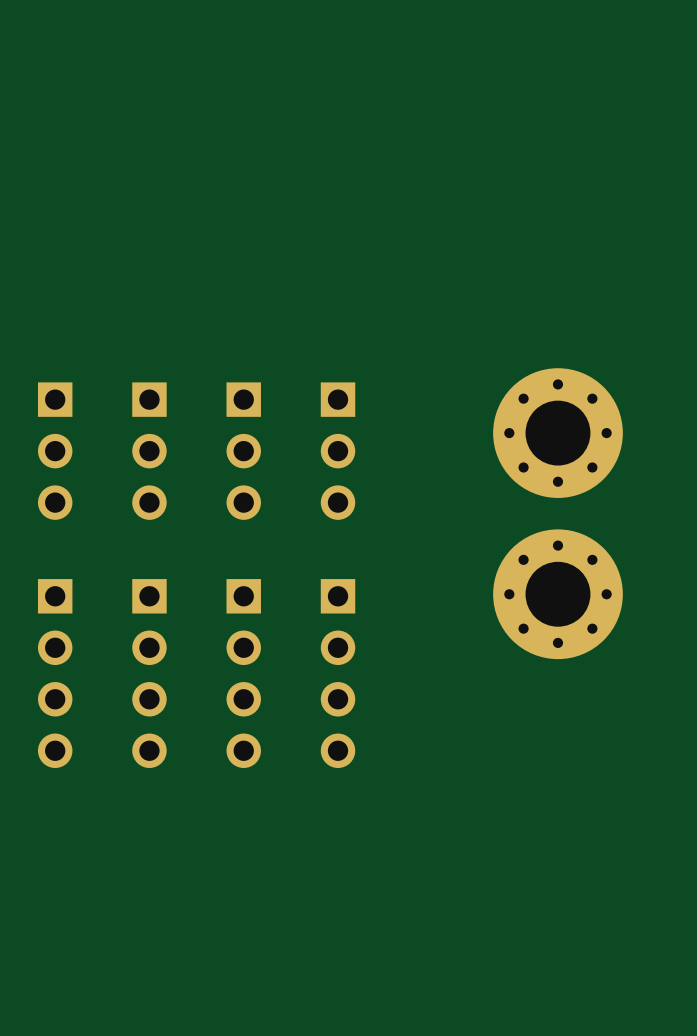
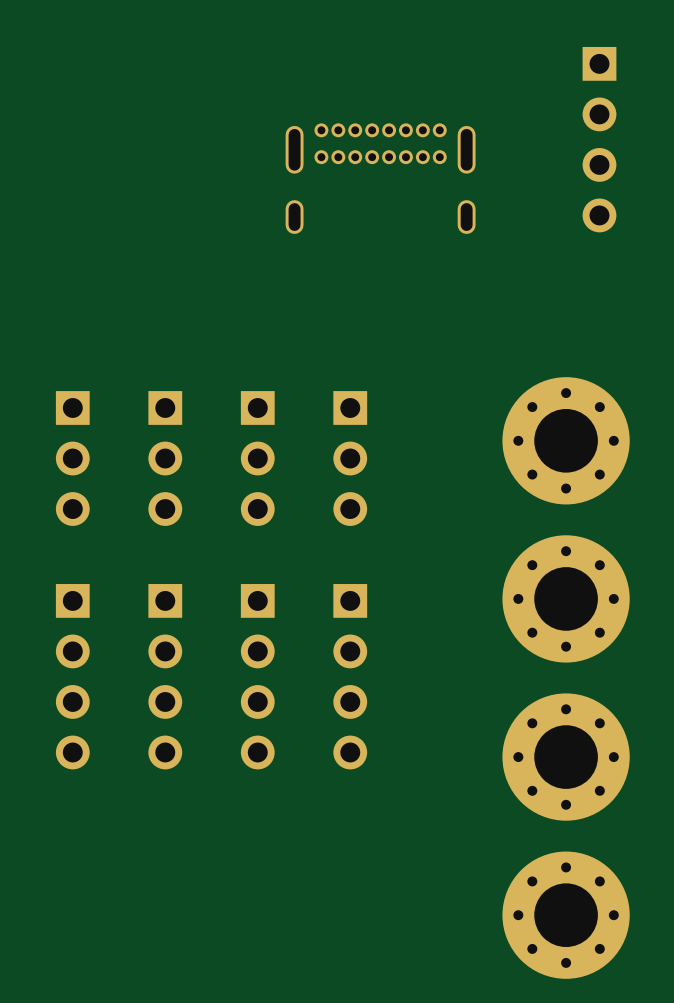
part: none -> (599, 139)
part: none -> (380, 178)
part: none -> (566, 757)
part: none -> (566, 915)

